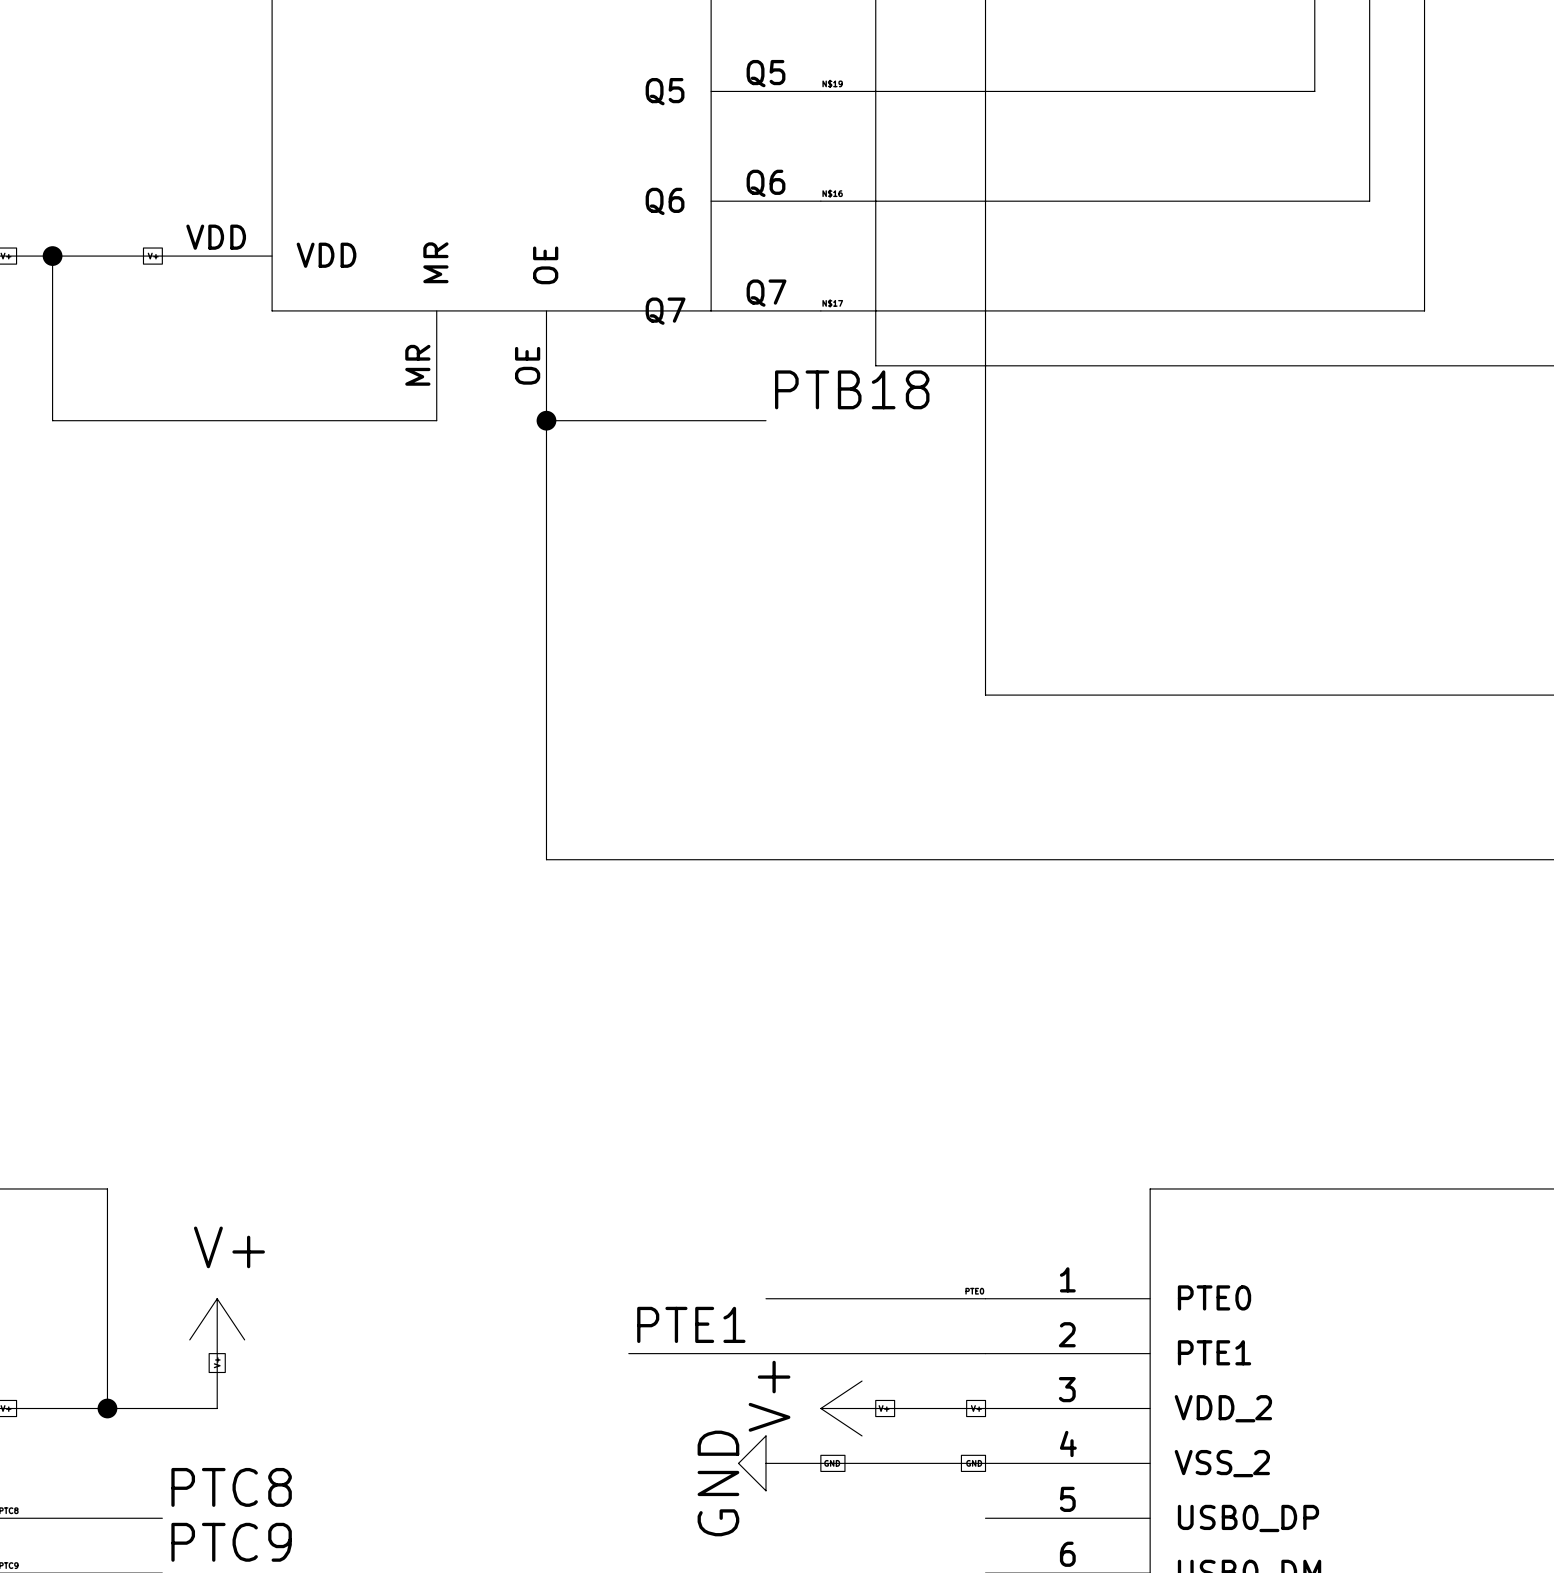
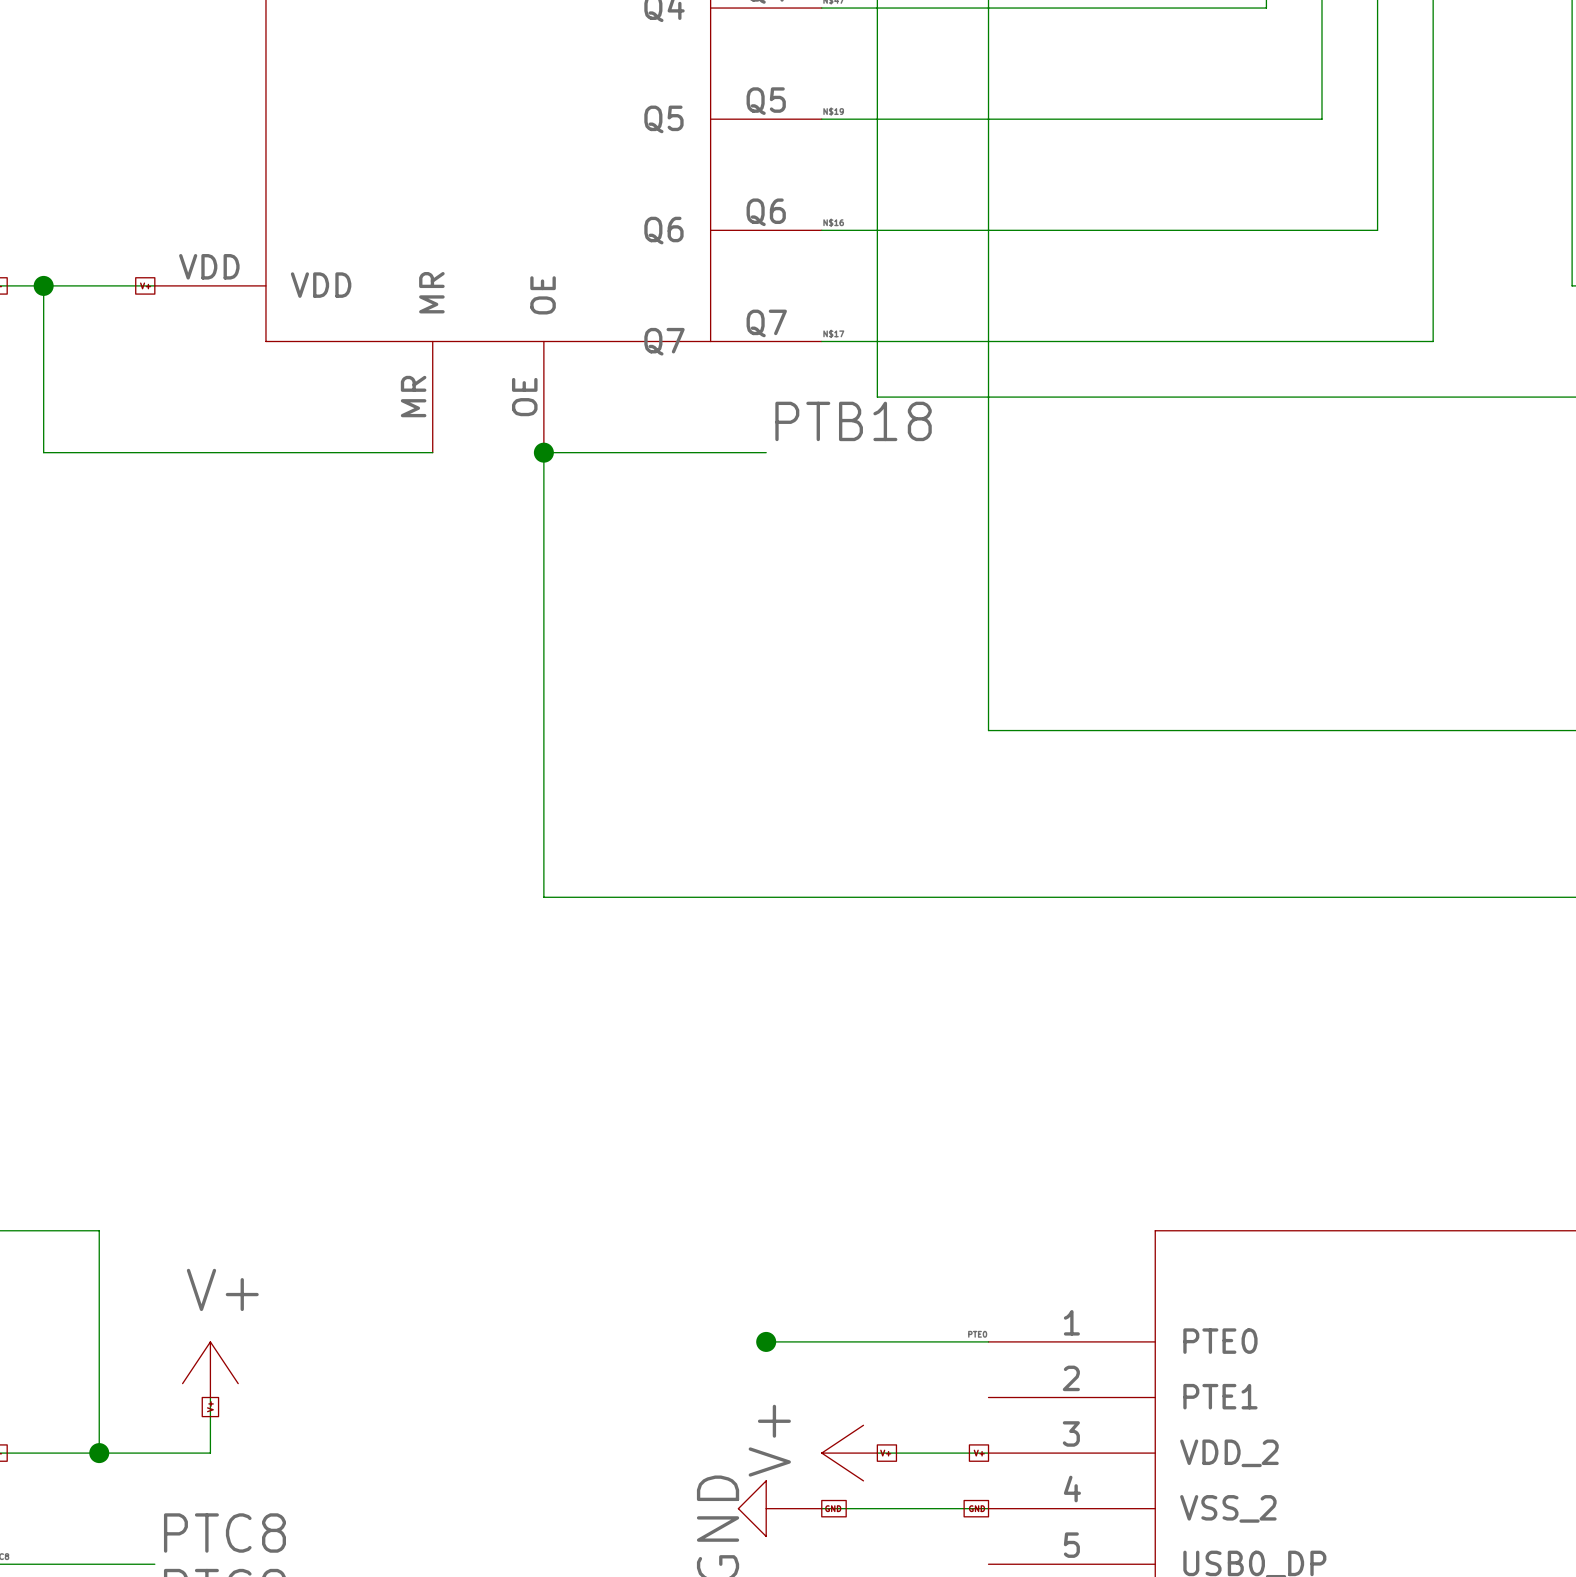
junction: none -> (766, 1341)
label: PTE1 (691, 1324) -> none
wire: (628, 1353) (985, 1353) -> none

